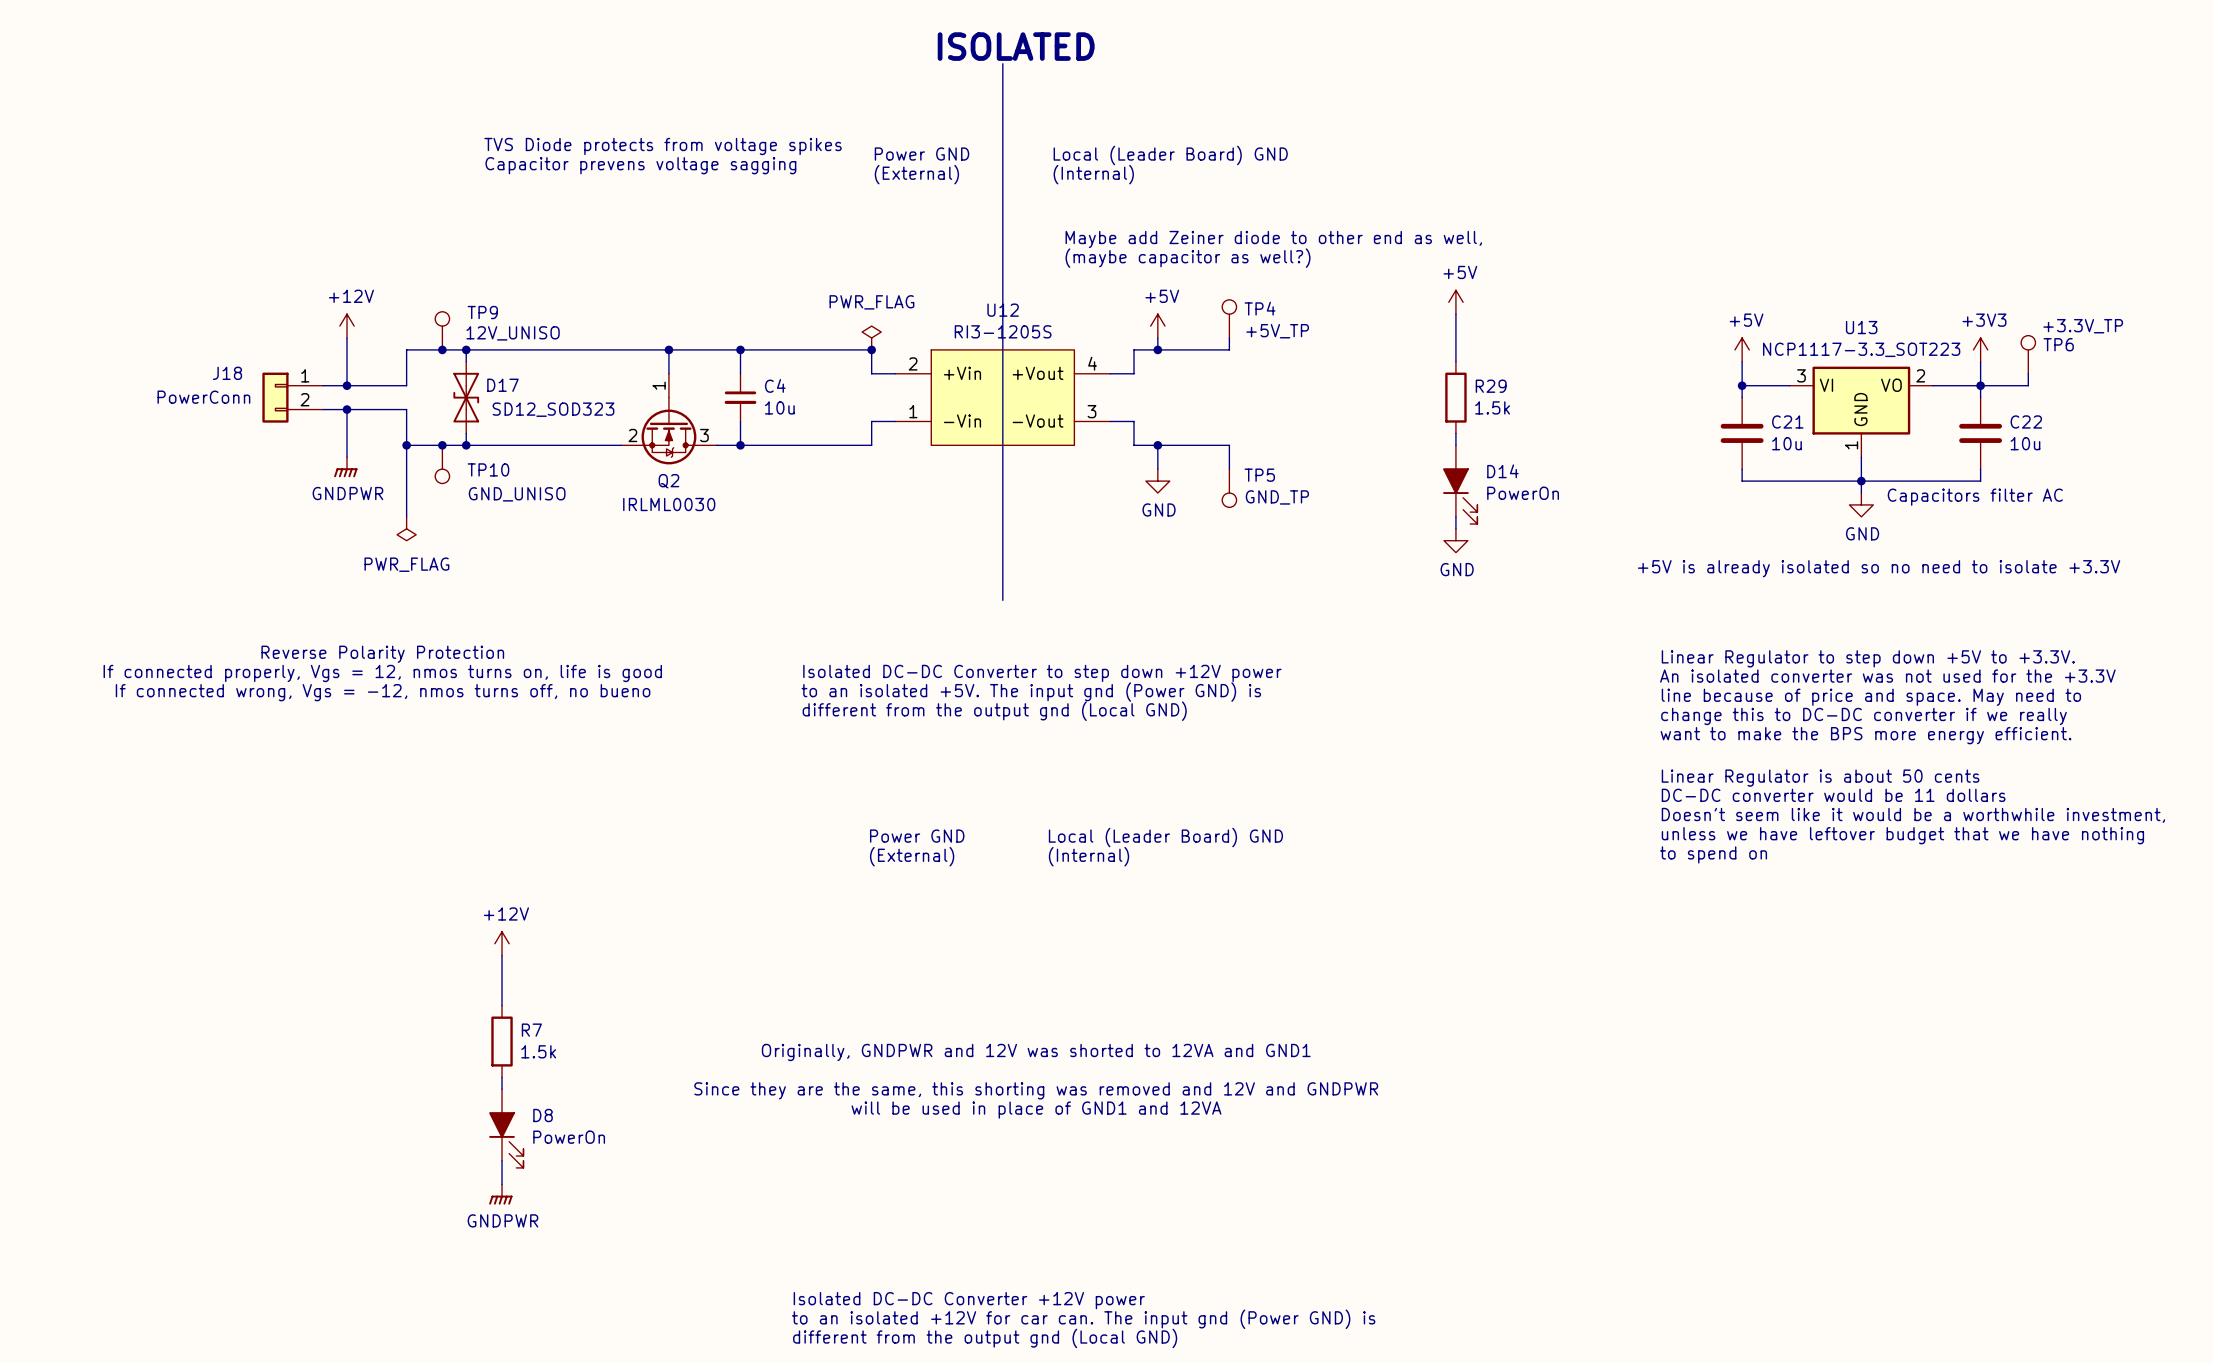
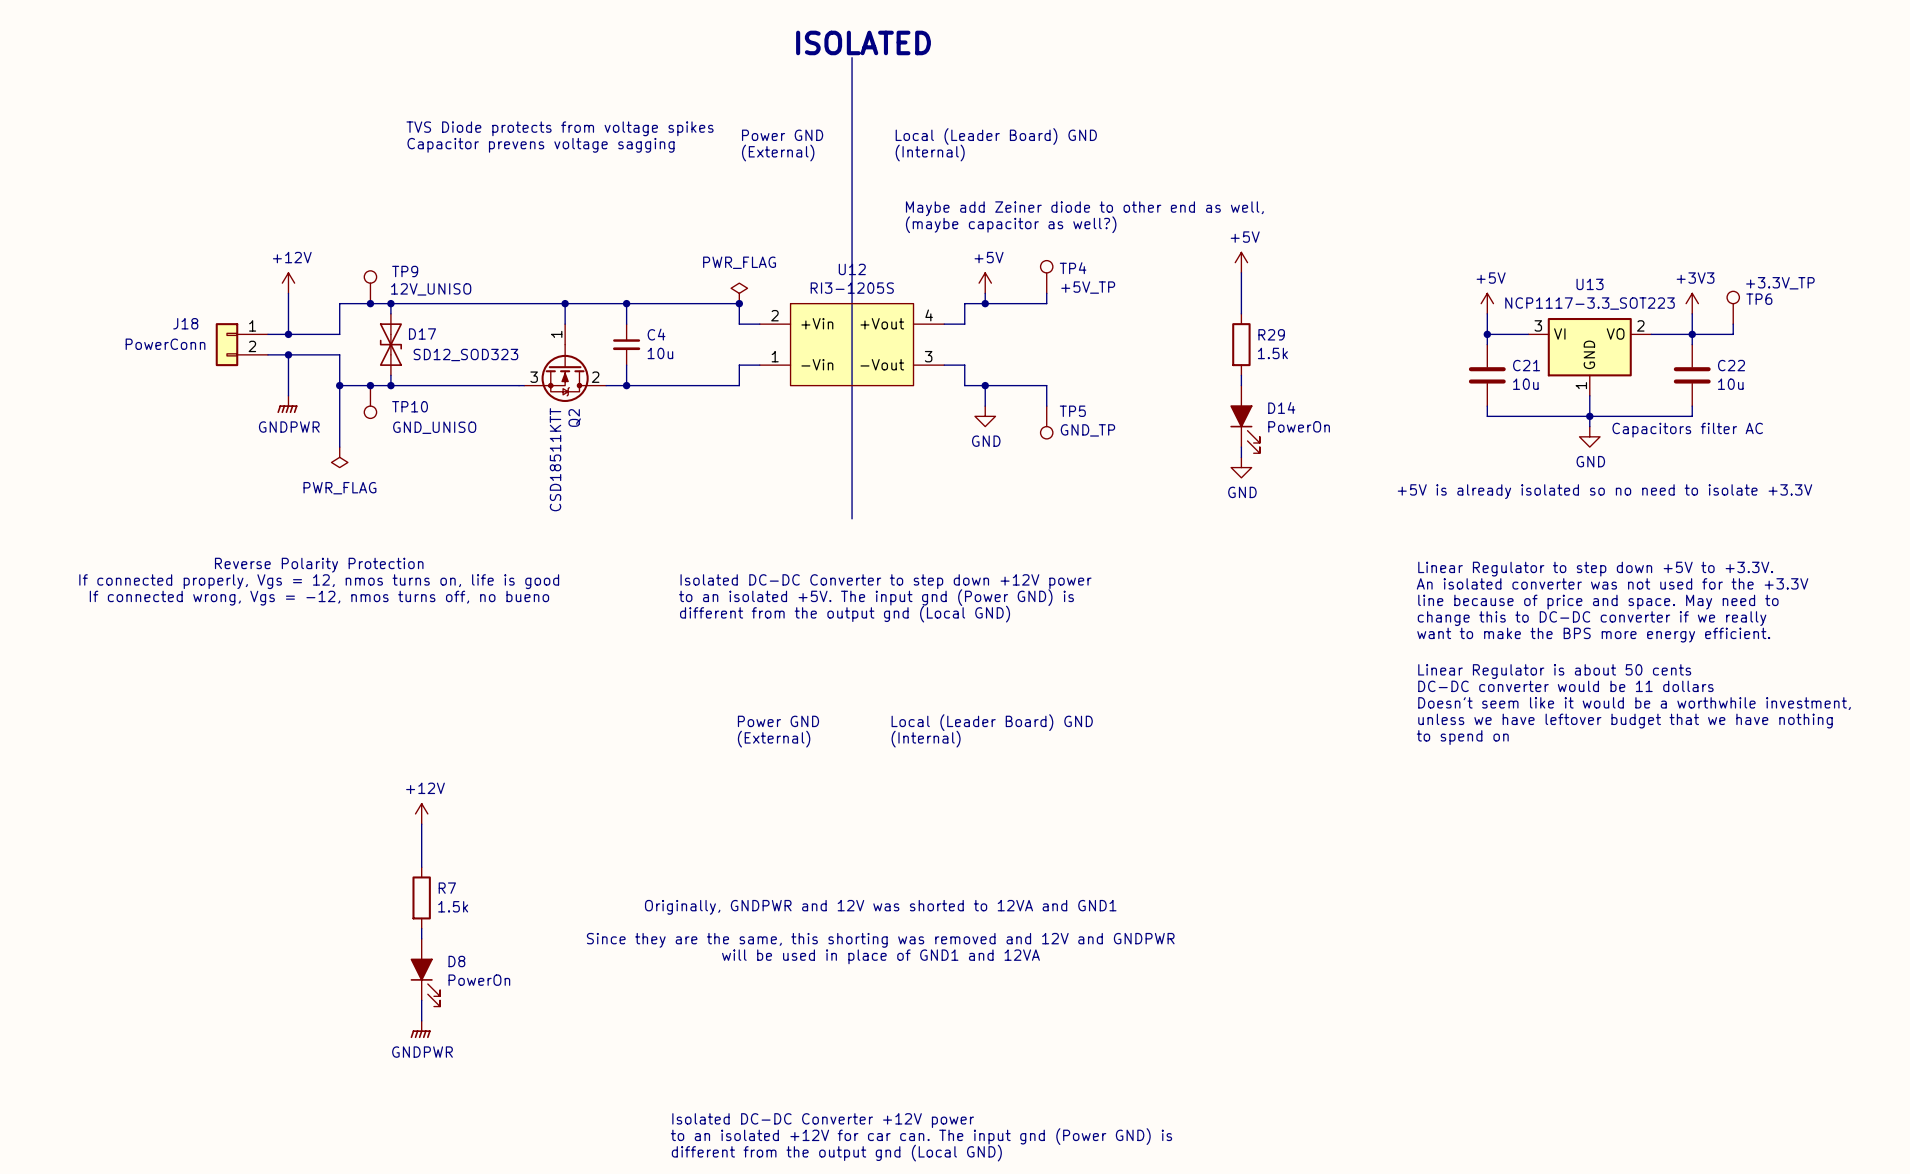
Q2 pin number: 2 (632, 435) -> 3 (534, 377)
Q2 pin number: 3 (704, 435) -> 2 (595, 377)
Q2 name rotation: 0° (668, 481) -> 90° counterclockwise (574, 417)
Q2 value: IRLML0030 (669, 504) -> CSD18511KTT (555, 459)

